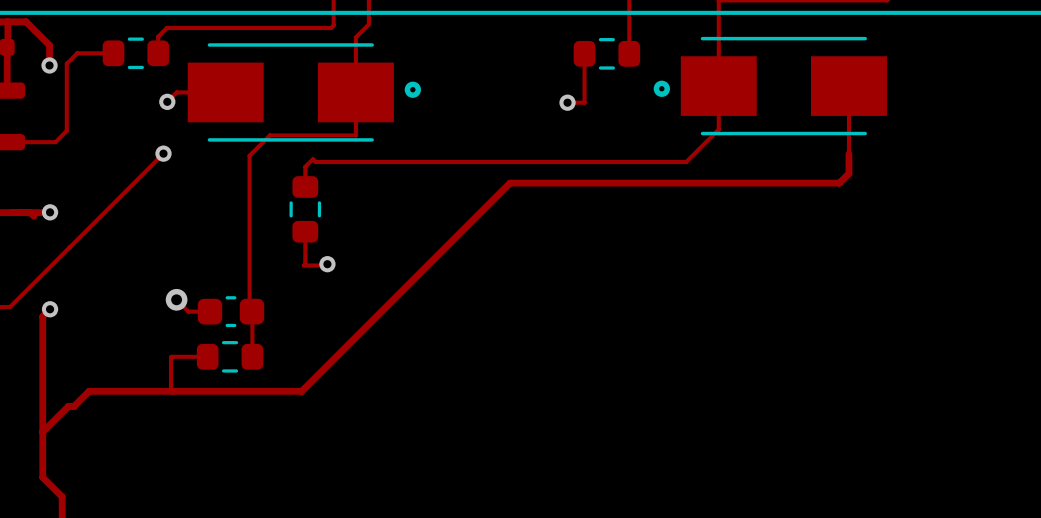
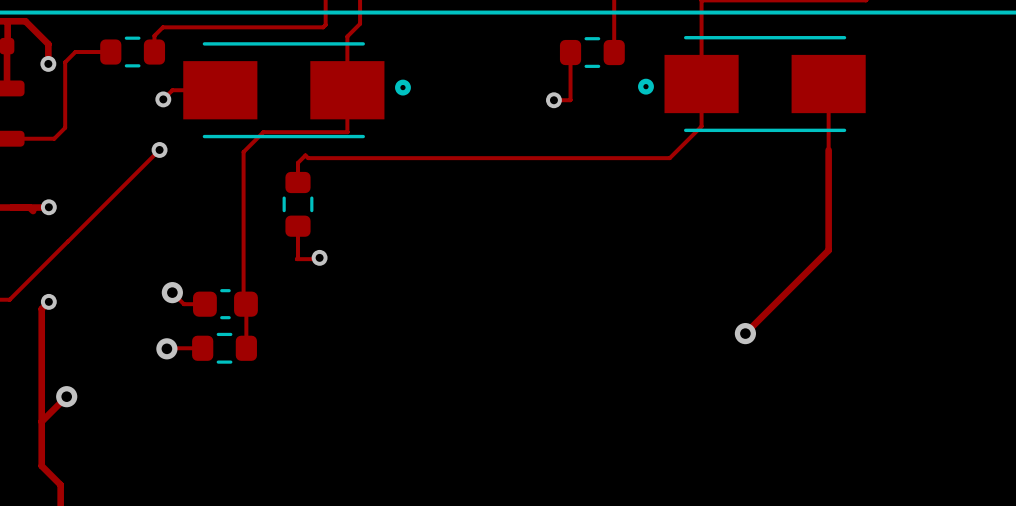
track: (848, 173) (839, 183) (509, 183) (301, 391) (89, 391) (74, 406) (68, 406) -> (828, 169) (828, 250) (745, 333)
via: none -> (745, 333)
track: (170, 357) (170, 389) (172, 391) -> none
via: none -> (166, 348)
via: none -> (66, 396)

